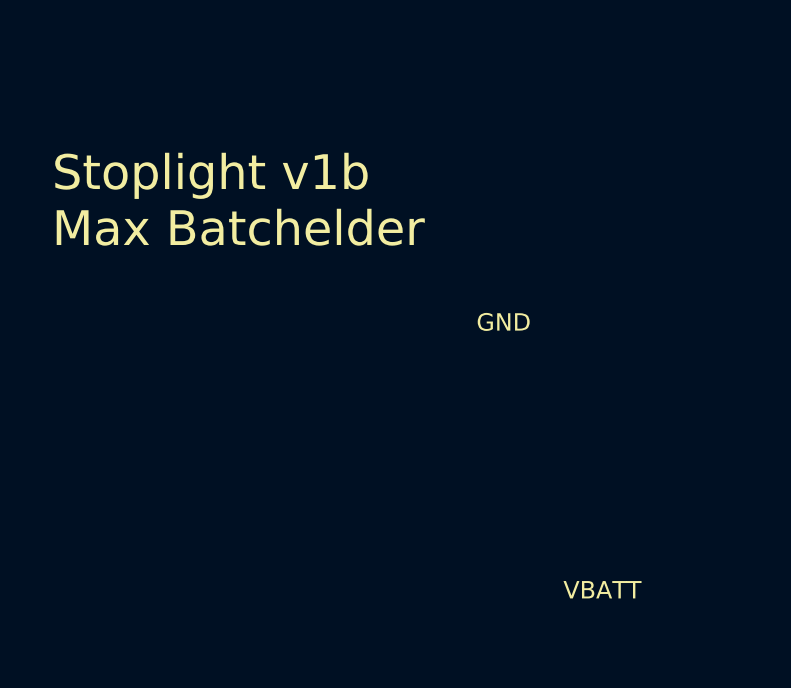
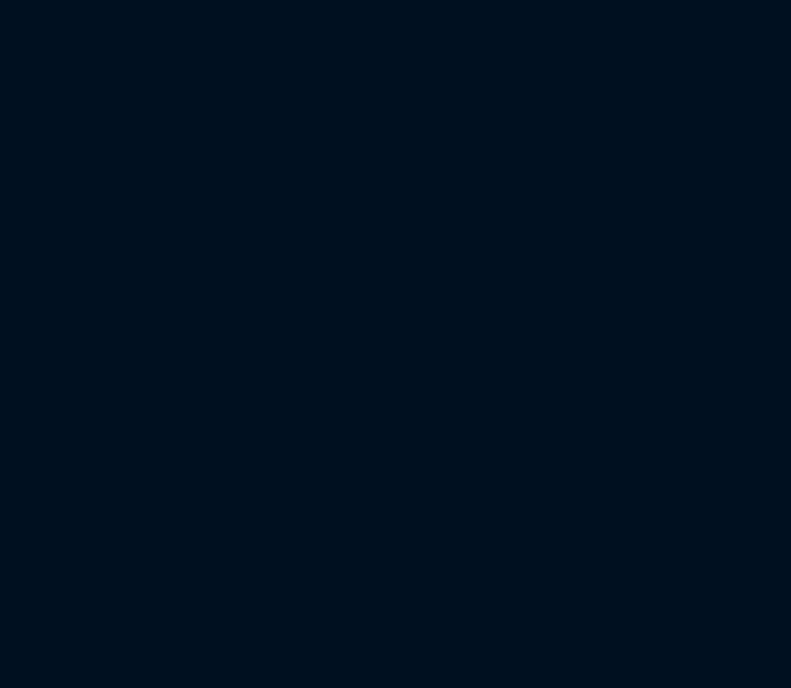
text: Stoplight v1b (211, 175) -> none
text: Max Batchelder (240, 227) -> none
text: GND (503, 321) -> none
text: VBATT (602, 589) -> none

